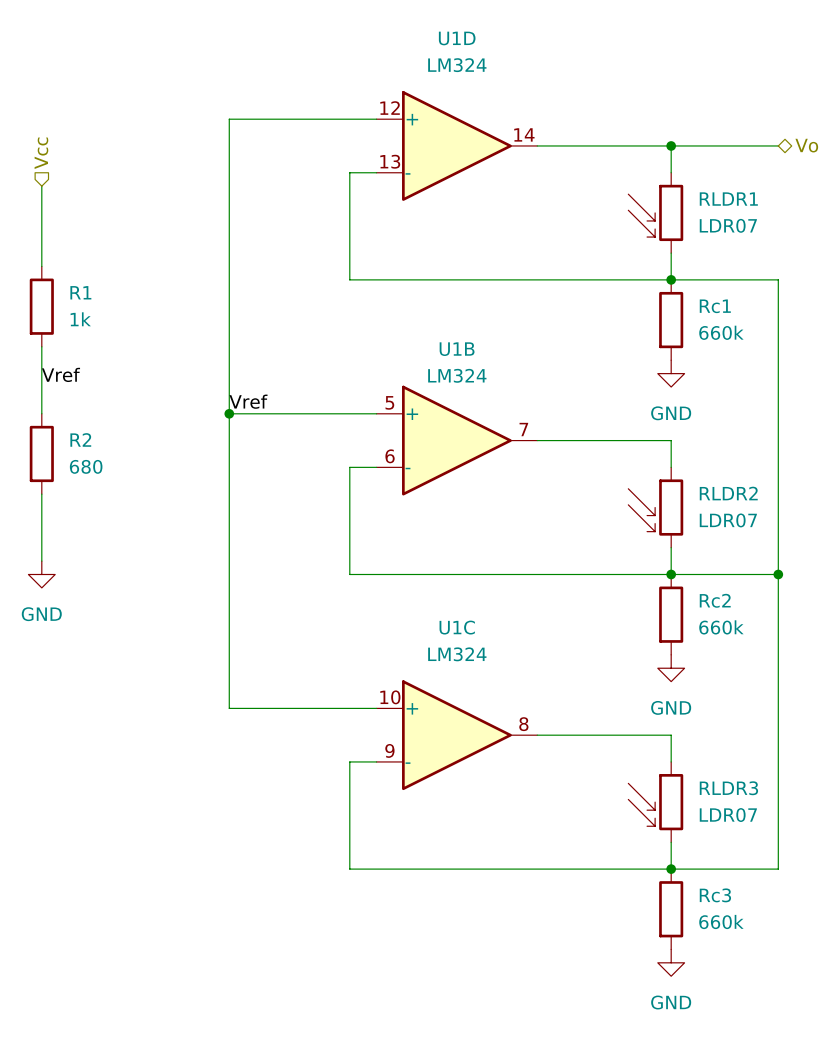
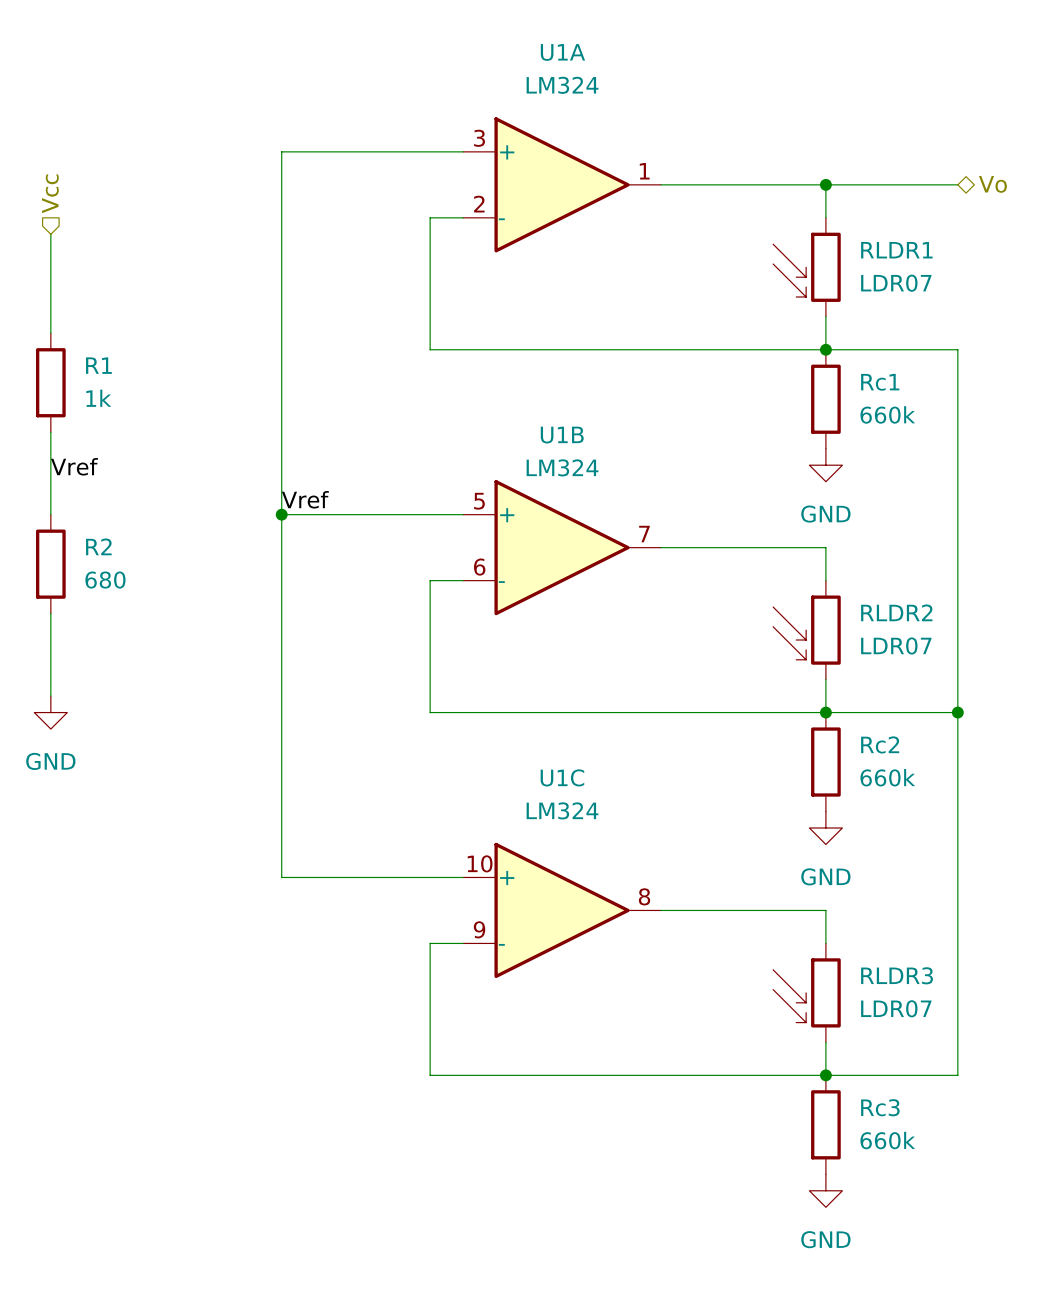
U1D name: U1D (457, 38) -> U1A (562, 52)
U1D pin number: 12 (390, 108) -> 3 (479, 138)
U1D pin number: 14 (524, 134) -> 1 (644, 171)
U1D pin number: 13 (390, 161) -> 2 (479, 204)

